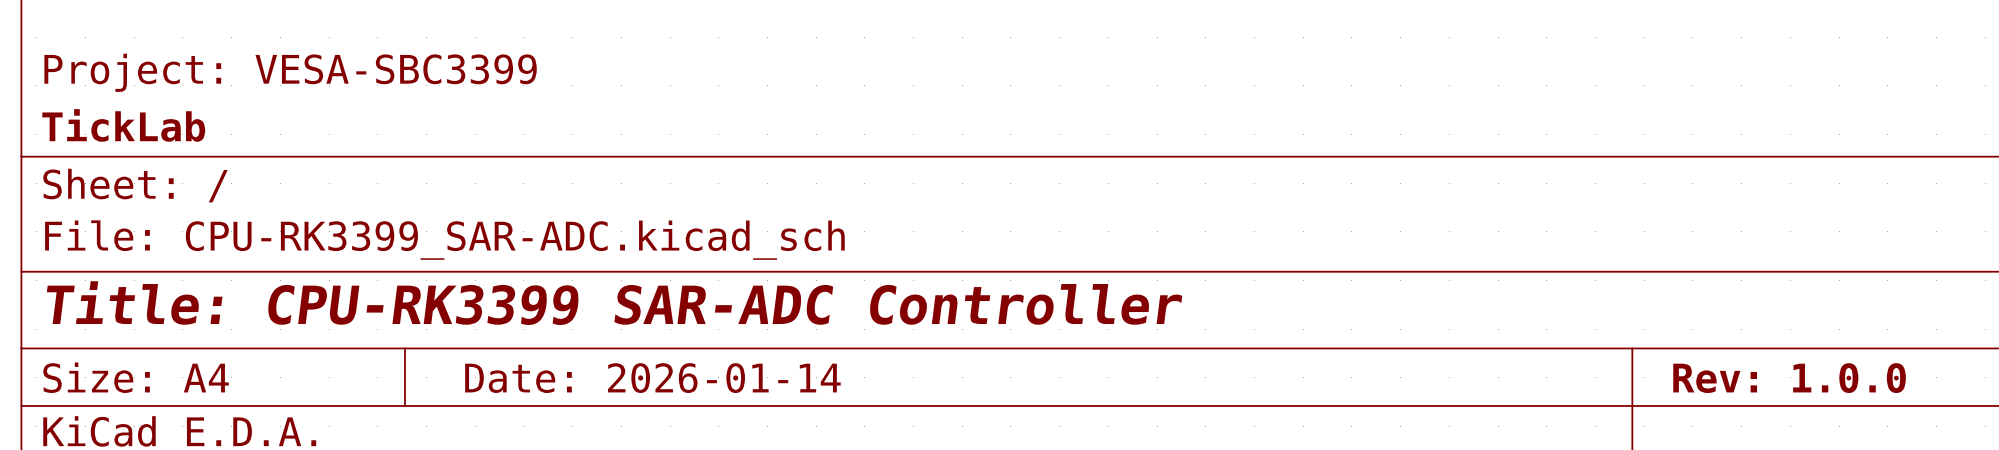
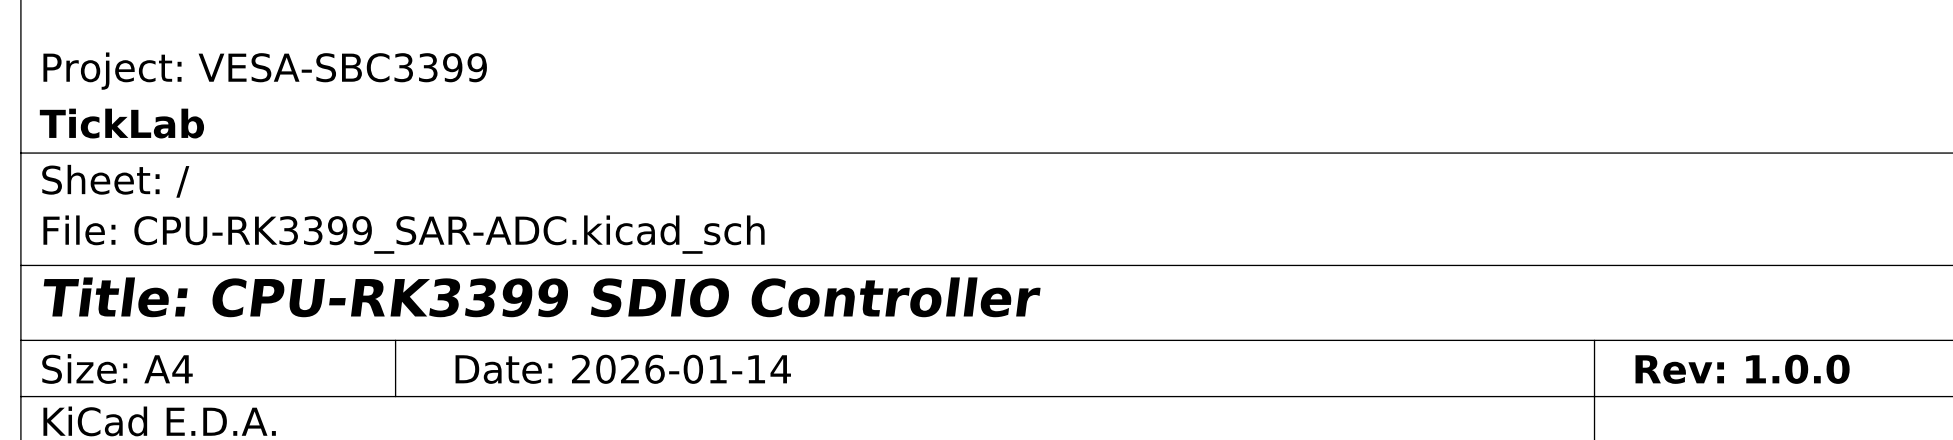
title block: Title: CPU-RK3399 SAR-ADC Controller (614, 303) -> Title: CPU-RK3399 SDIO Controller (542, 297)

